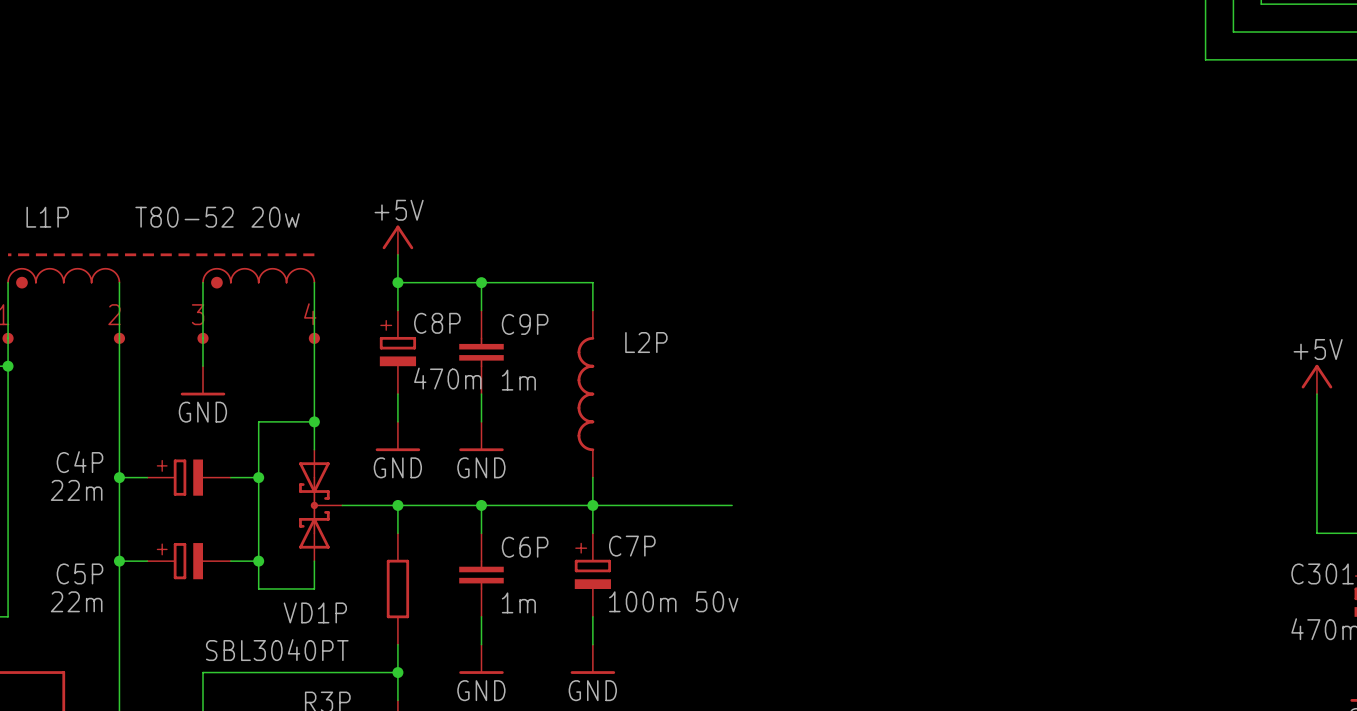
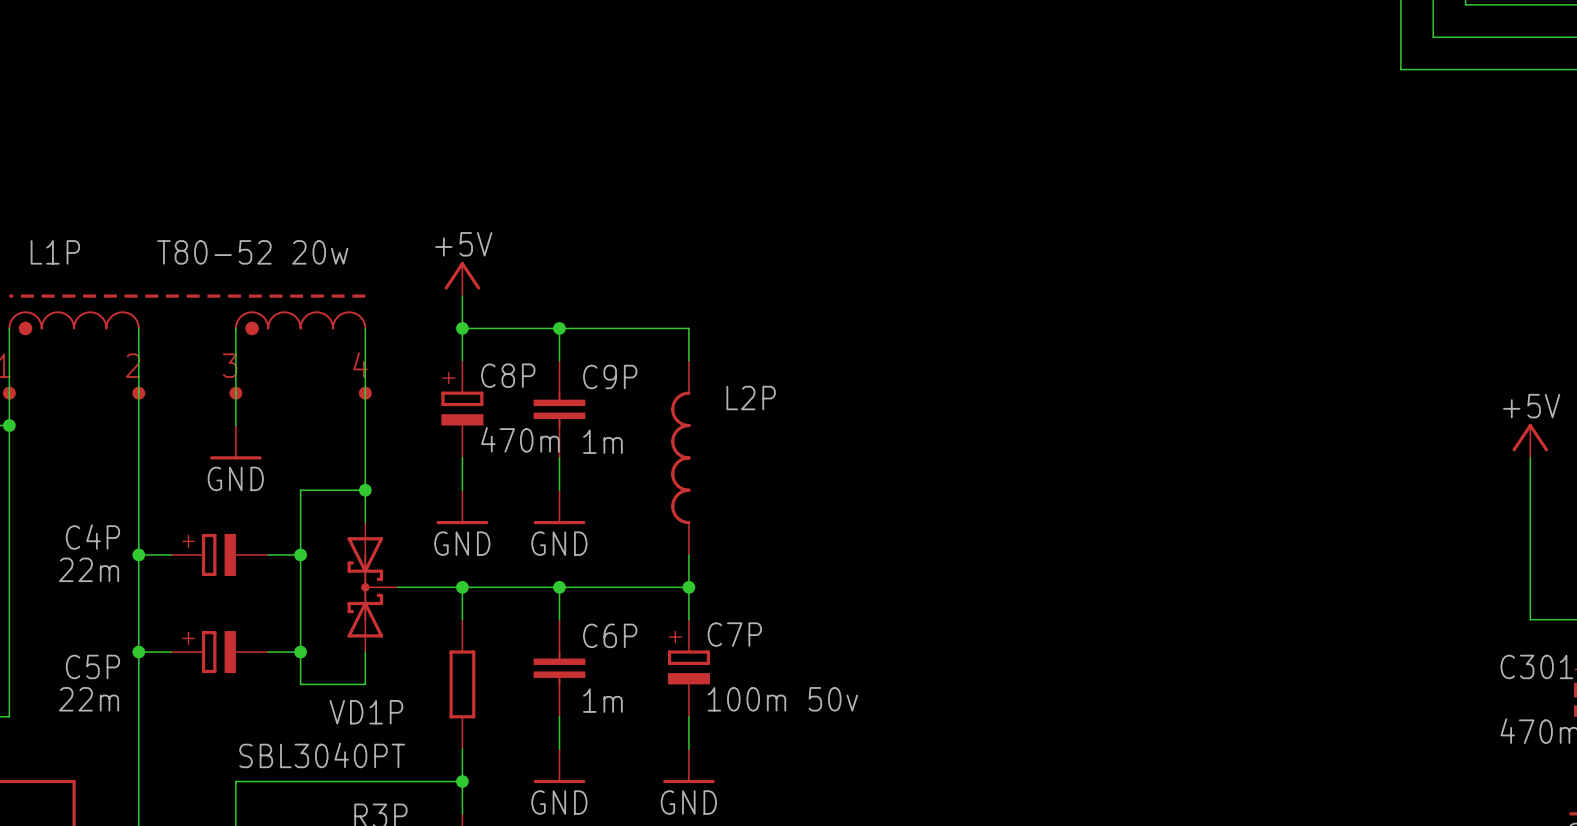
wire: (592, 505) (732, 505) -> none

